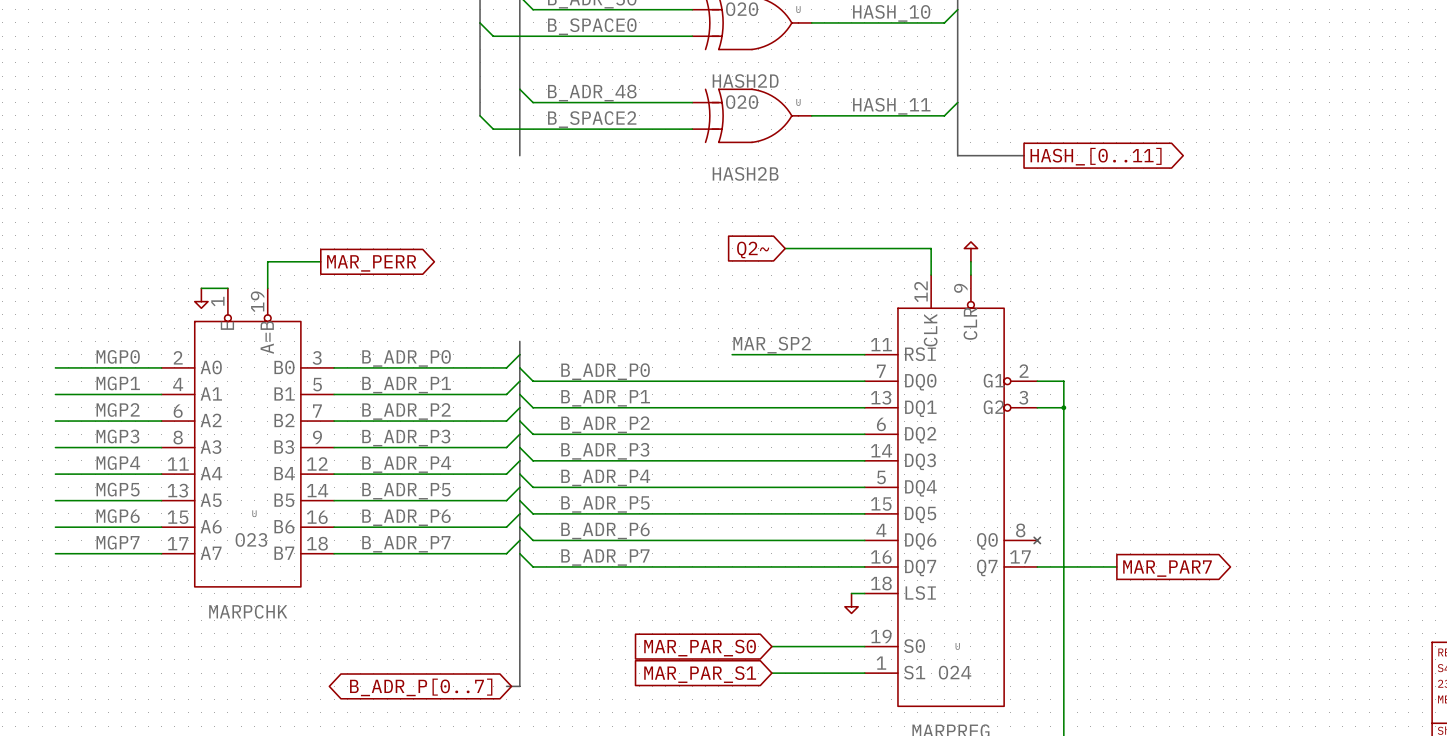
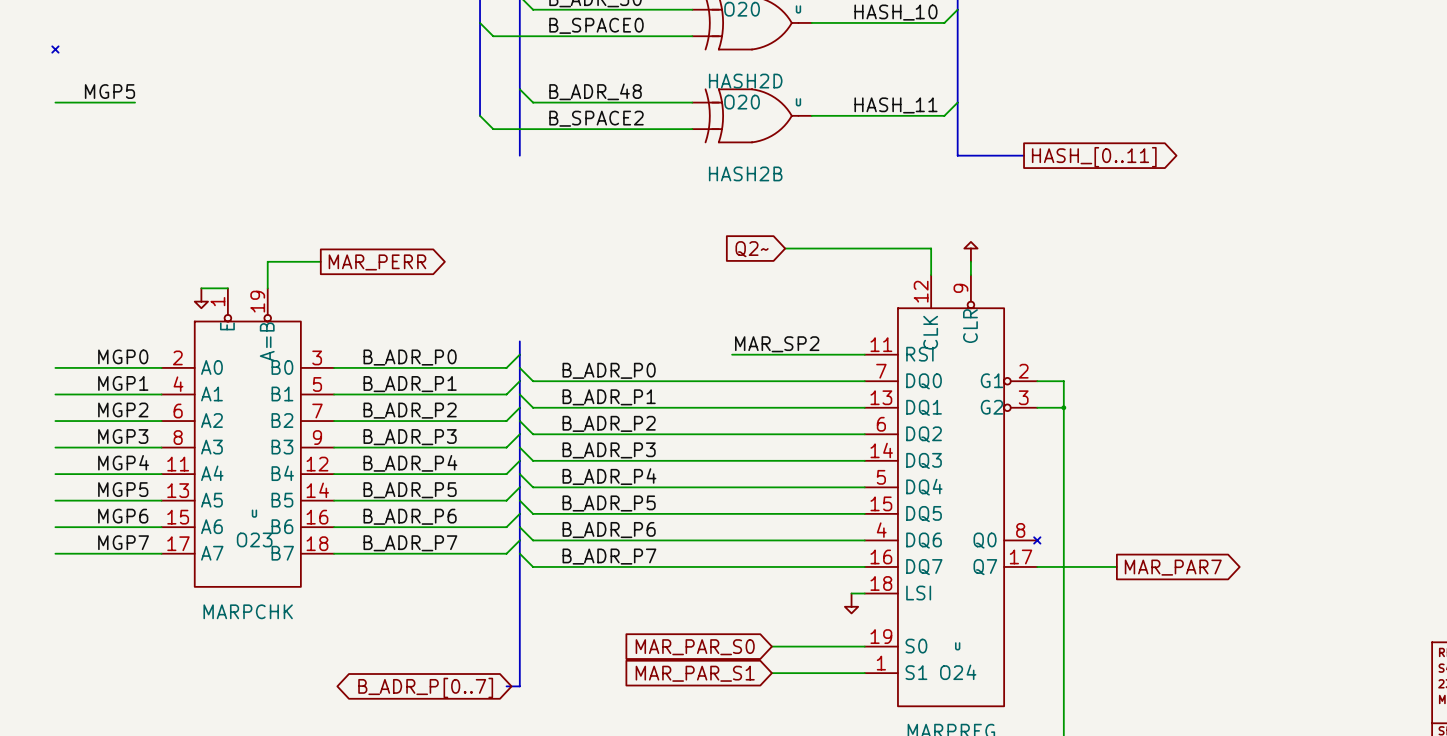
no-connect mark: none -> (55, 49)
label: none -> MGP5 (109, 91)
wire: none -> (55, 102) (135, 102)

